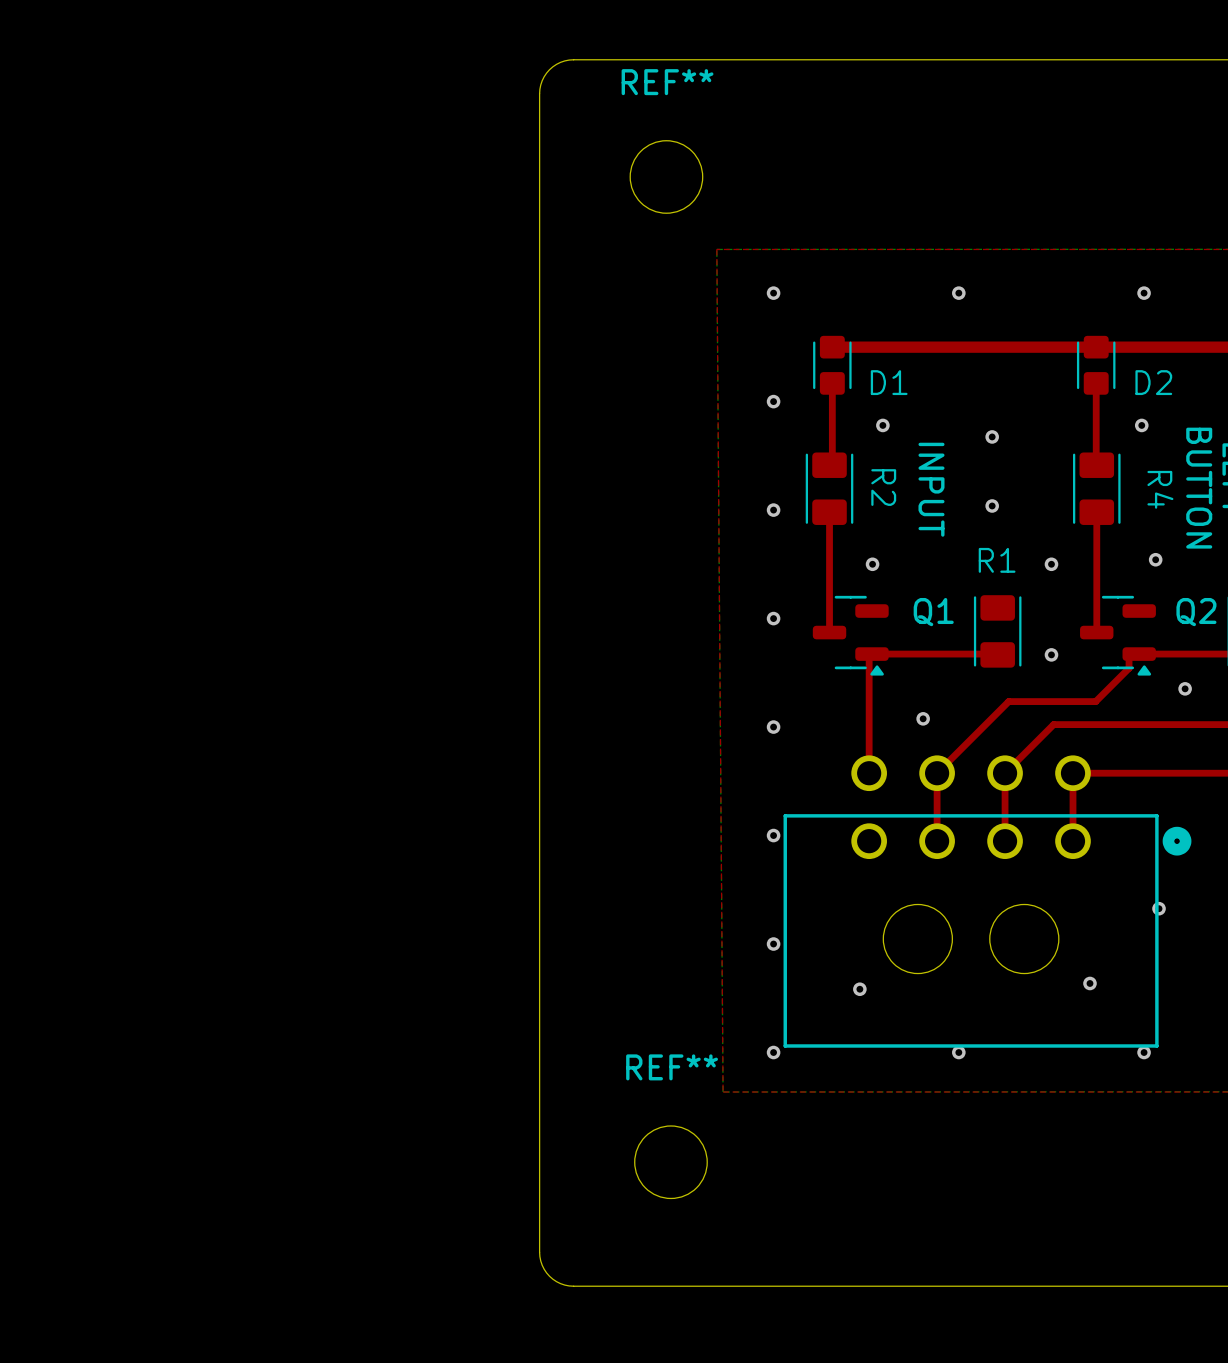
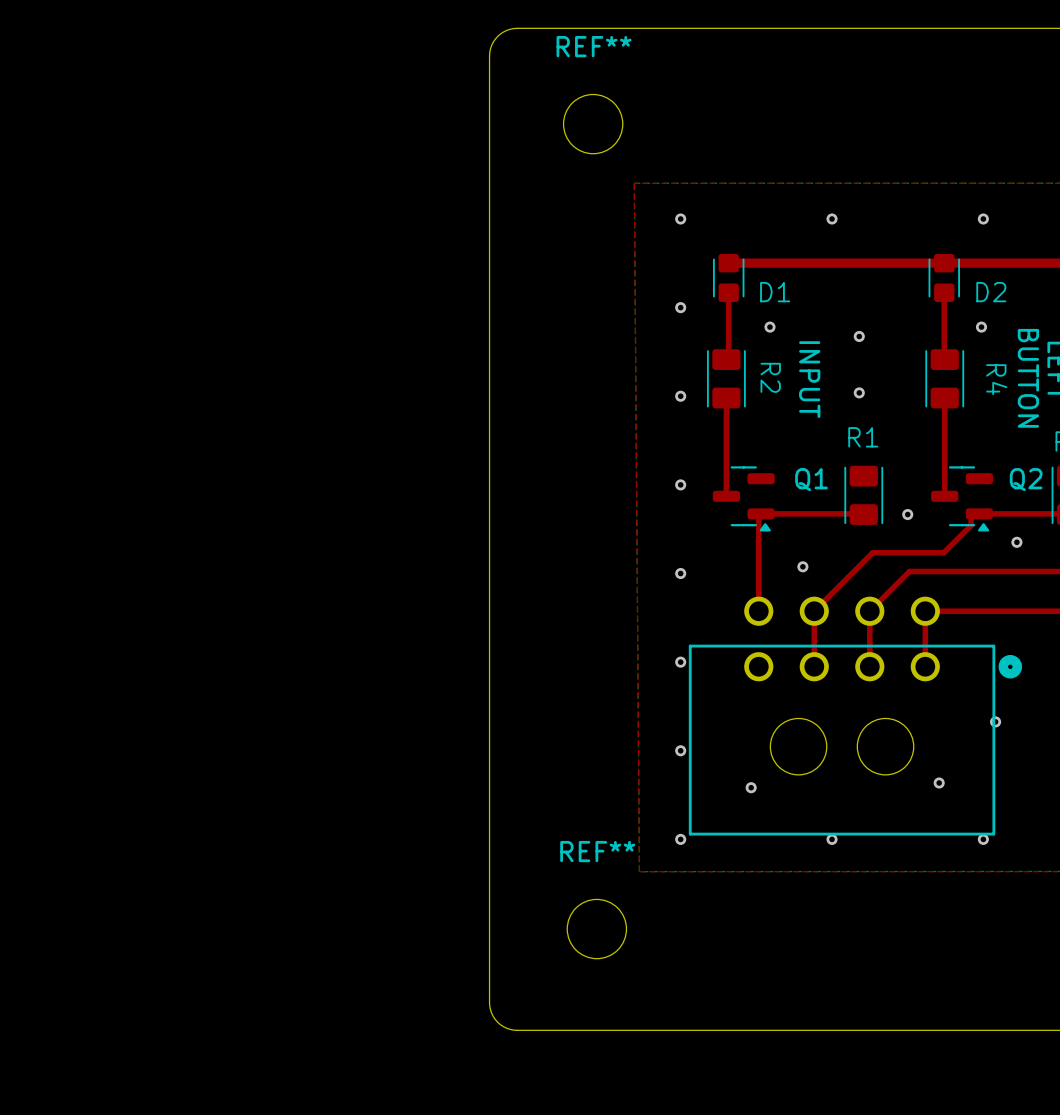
via: (1155, 559) -> none
via: (872, 564) -> none
via: (1051, 564) -> none

